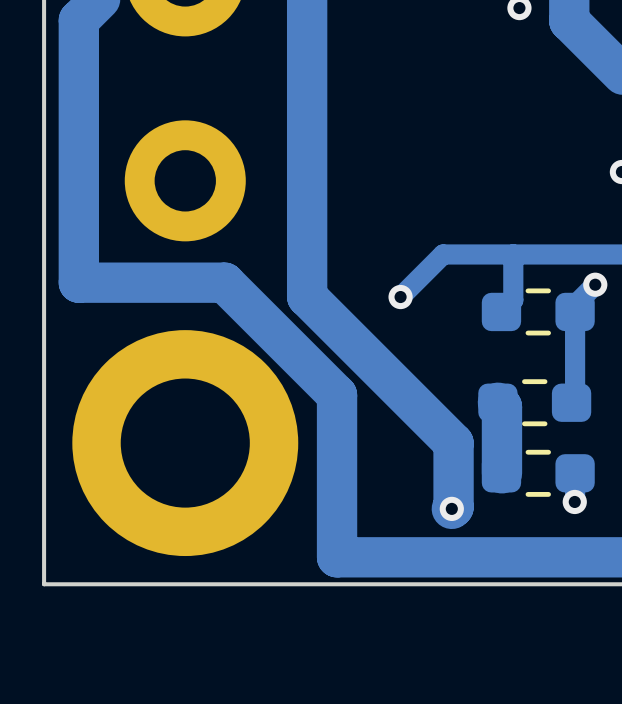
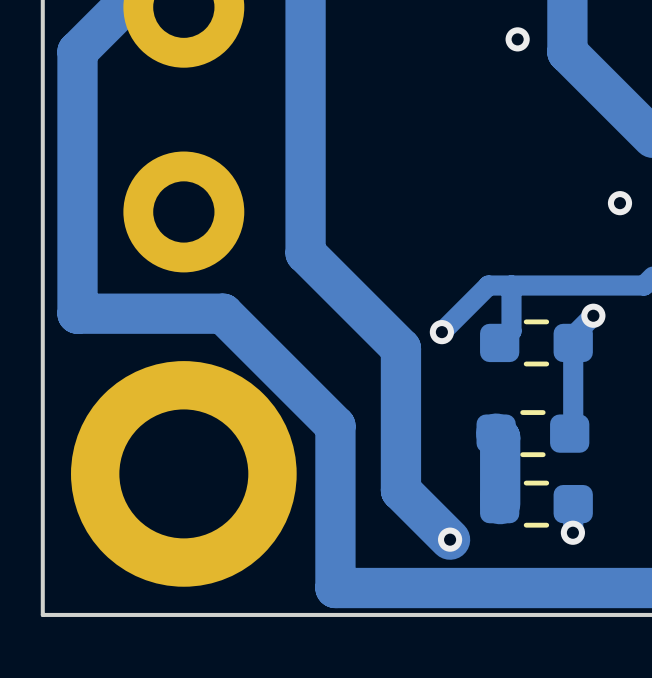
track: (307, 222) (307, 296) (453, 443) (453, 507) (451, 508) -> (305, 253) (400, 348) (400, 490) (450, 539)
track: (490, 254) (443, 254) (400, 297) -> (488, 285) (441, 332)
via position: (400, 297) -> (441, 332)

